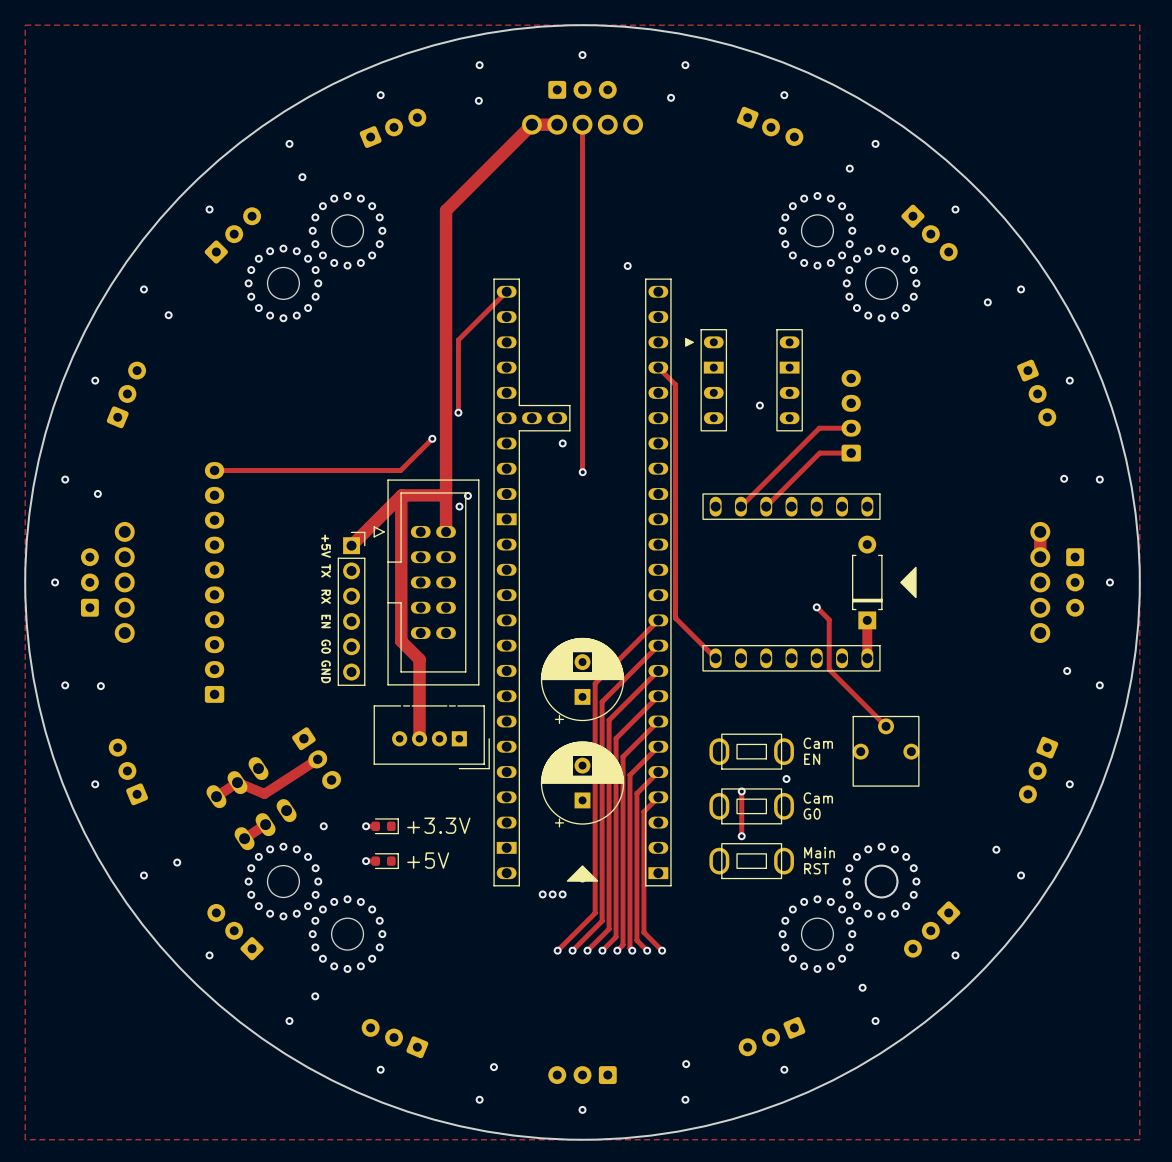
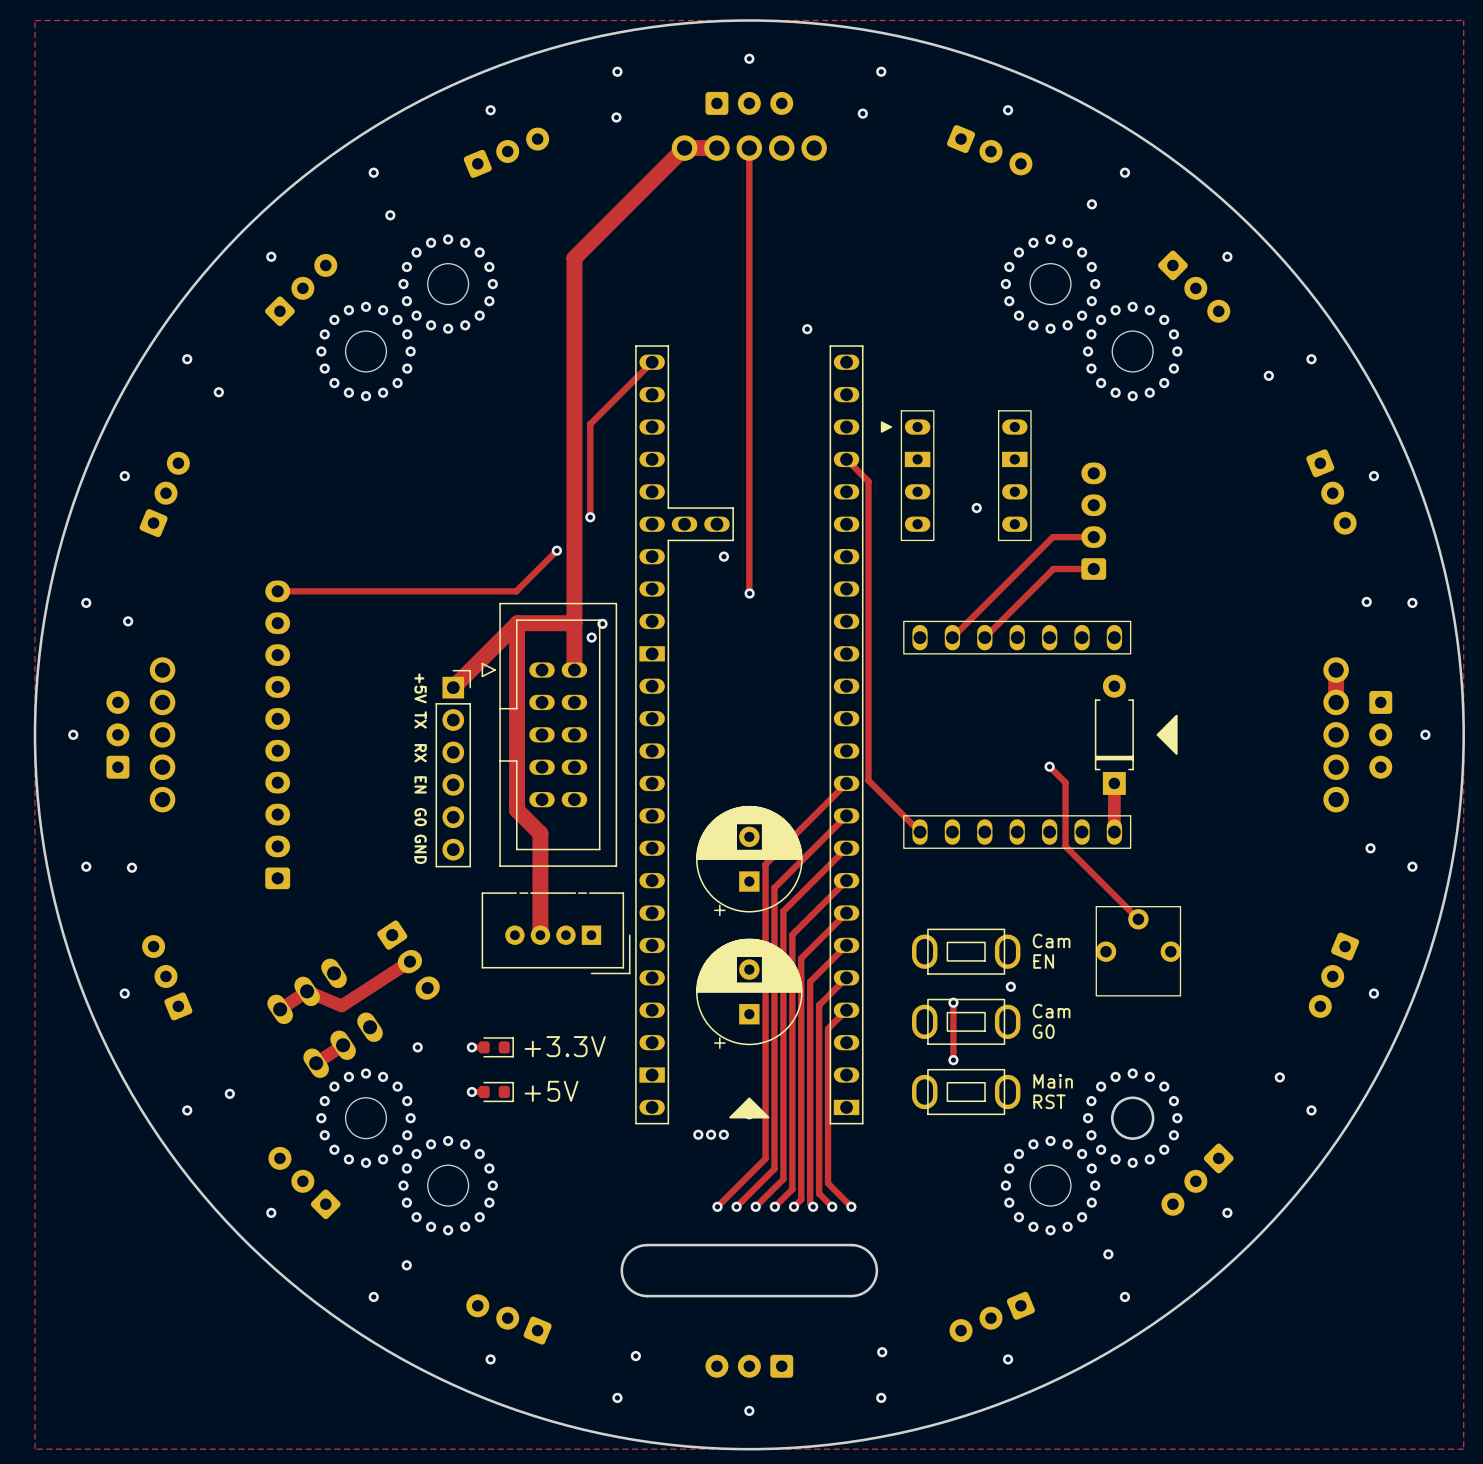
board edge: none -> (647, 1245) (854, 1245) (864, 1248) (871, 1255) (876, 1263) (876, 1273) (869, 1288) (854, 1295) (644, 1295) (635, 1293) (628, 1287) (623, 1279) (621, 1270) (623, 1261) (628, 1253) (635, 1248) (647, 1245)

